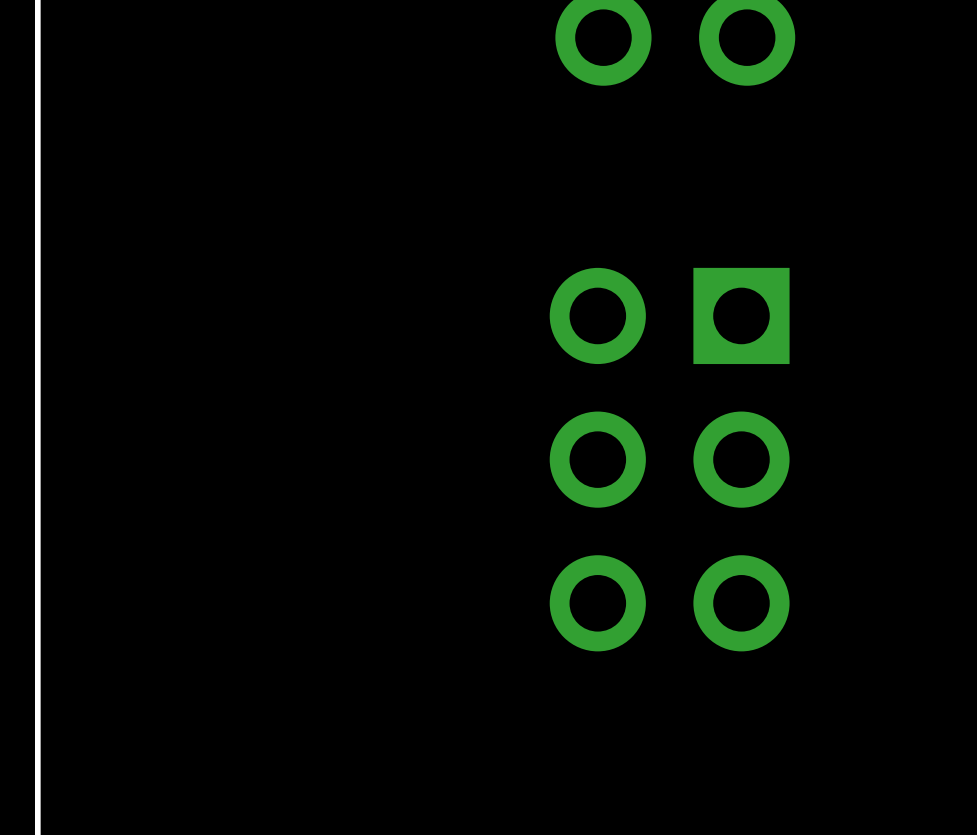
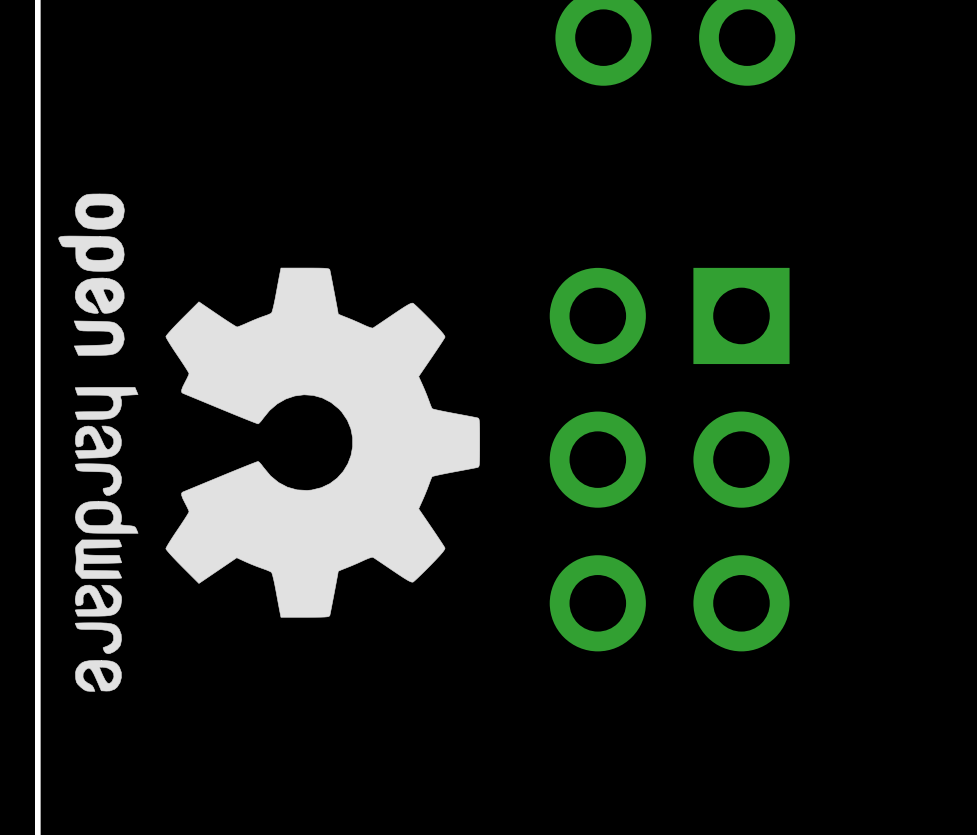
drawing: none -> [58, 193, 481, 692]

